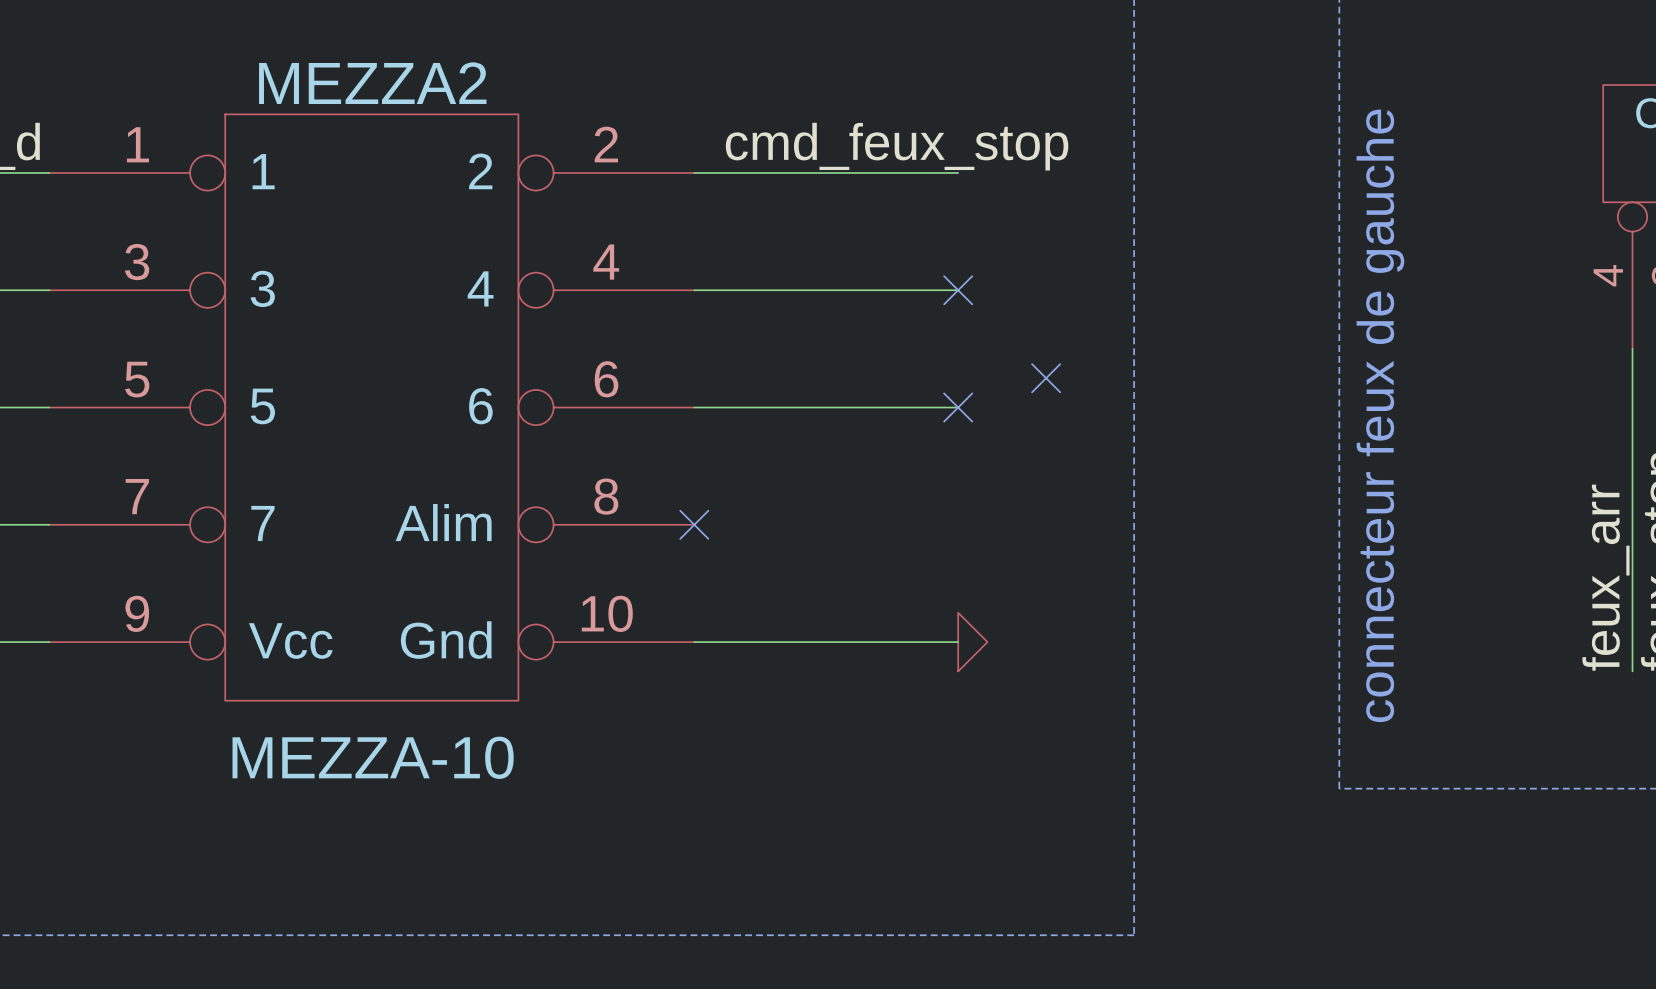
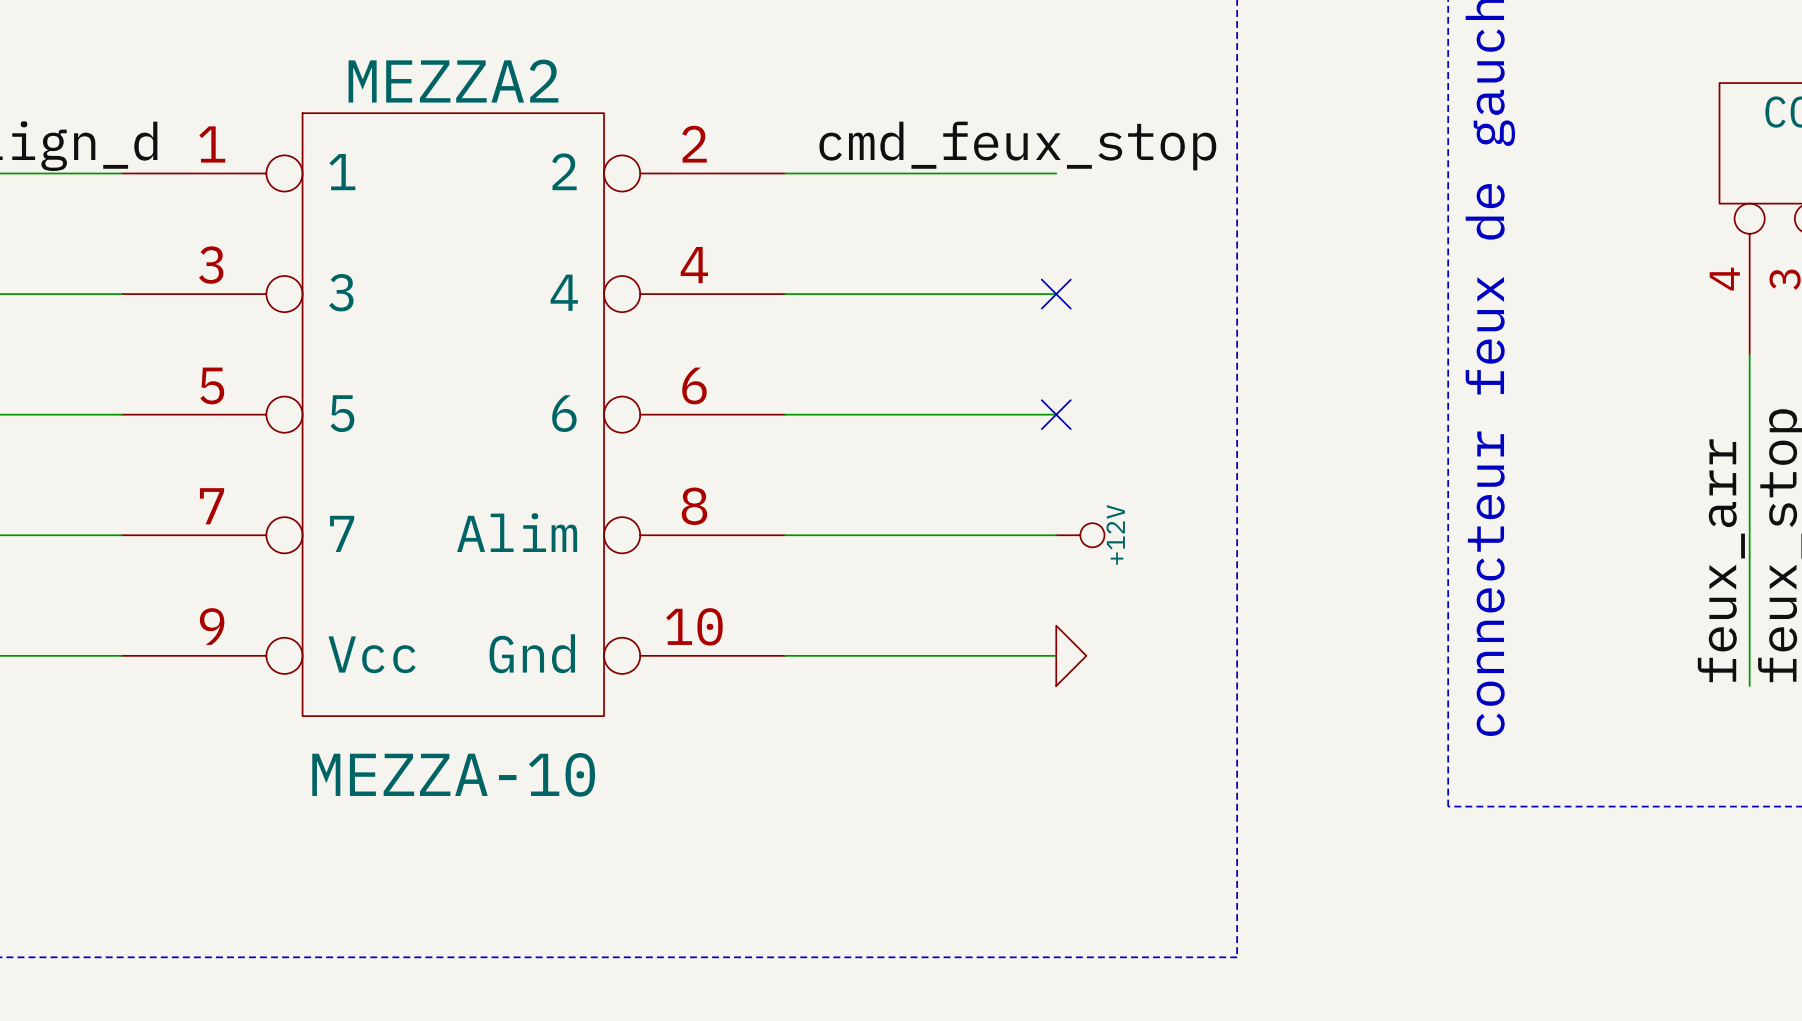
no-connect mark: (1046, 378) -> none
wire: none -> (784, 535) (1056, 535)
no-connect mark: (694, 524) -> none
power symbol: none -> +12V (1080, 535)

